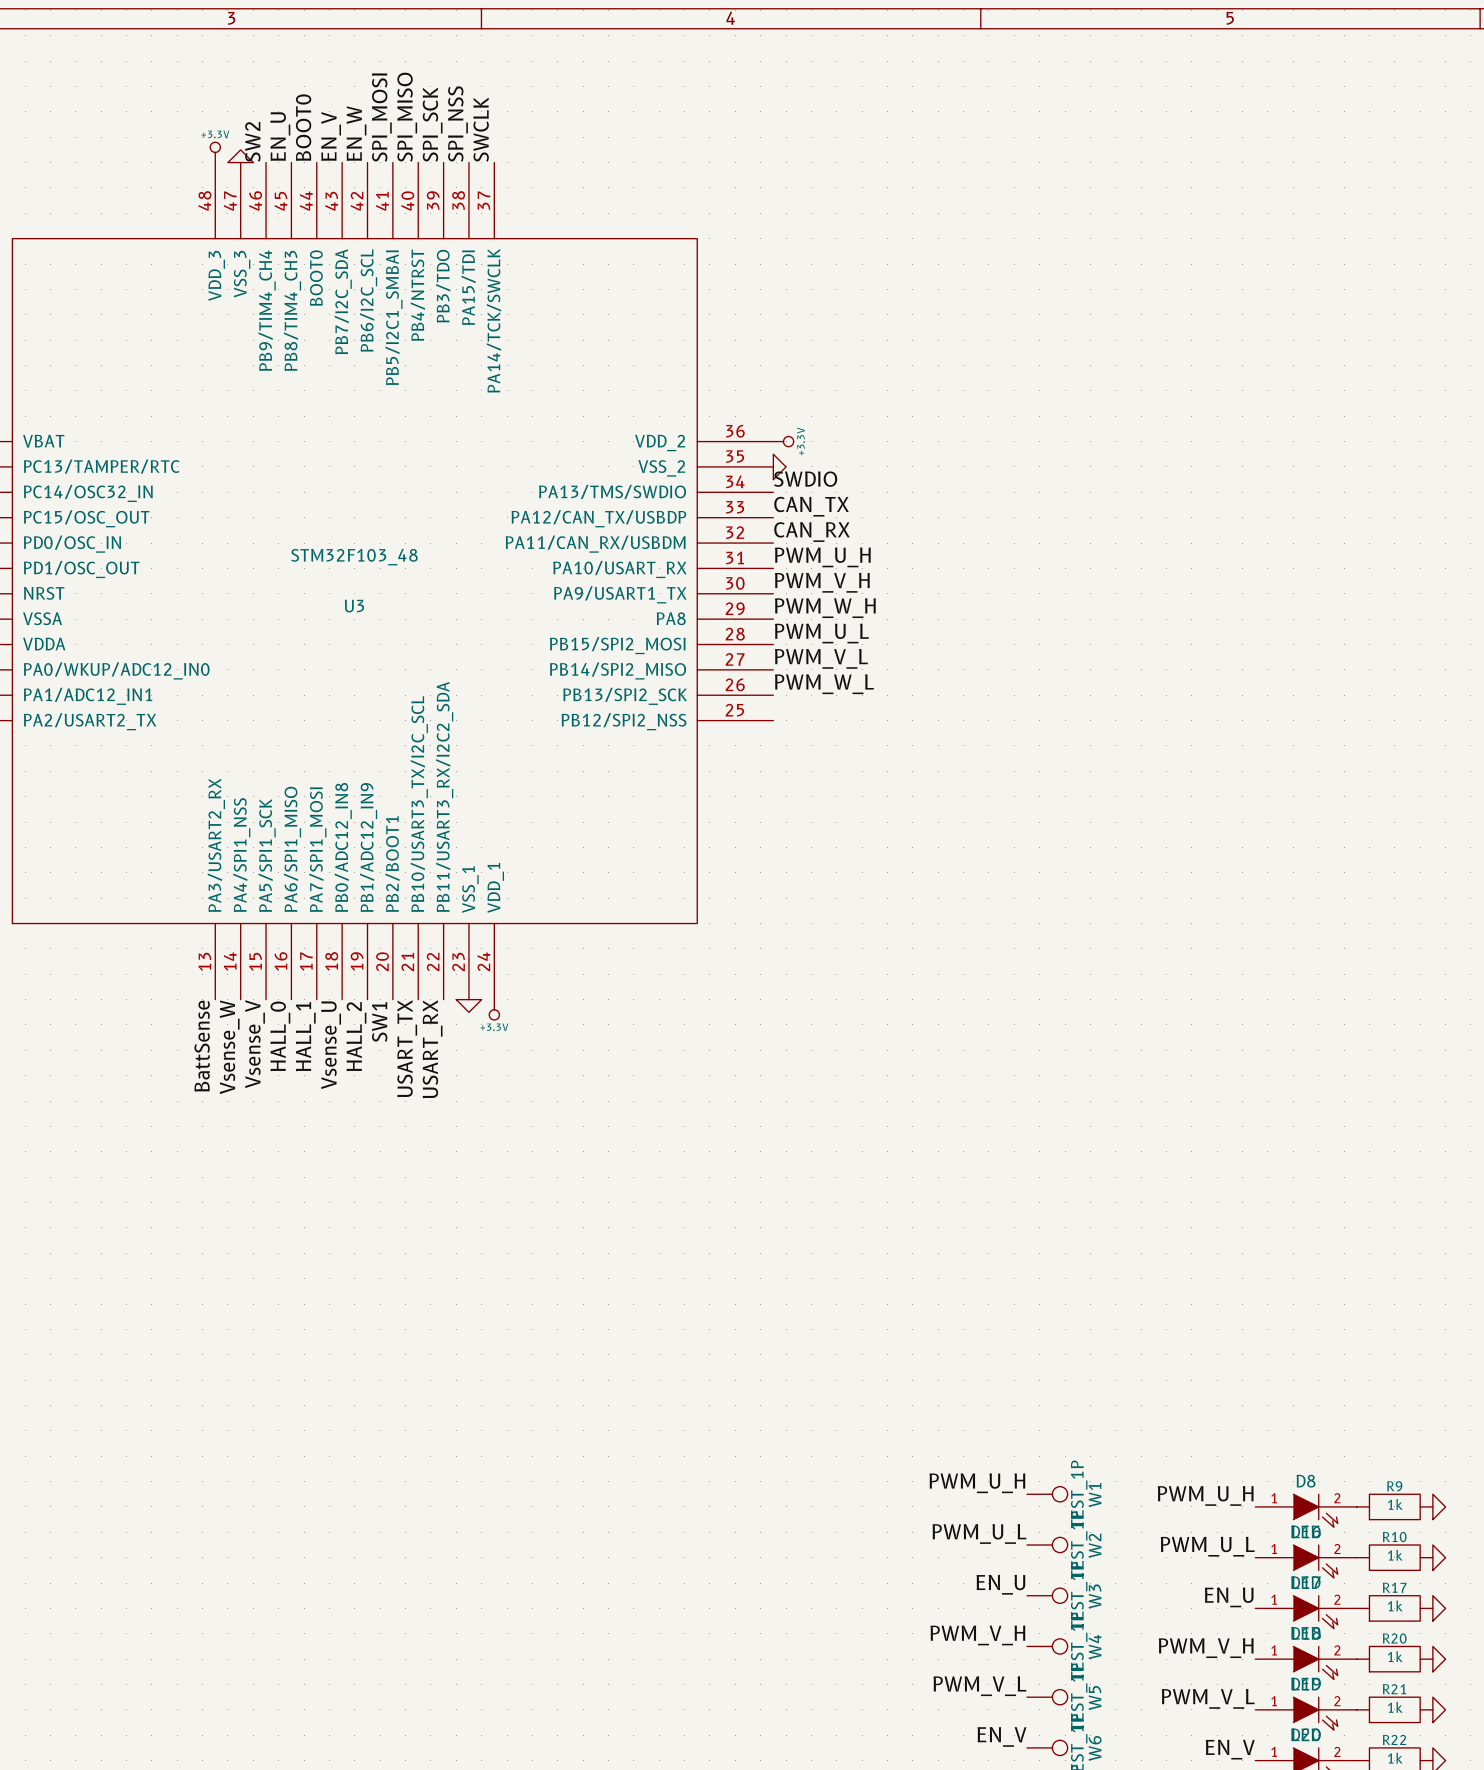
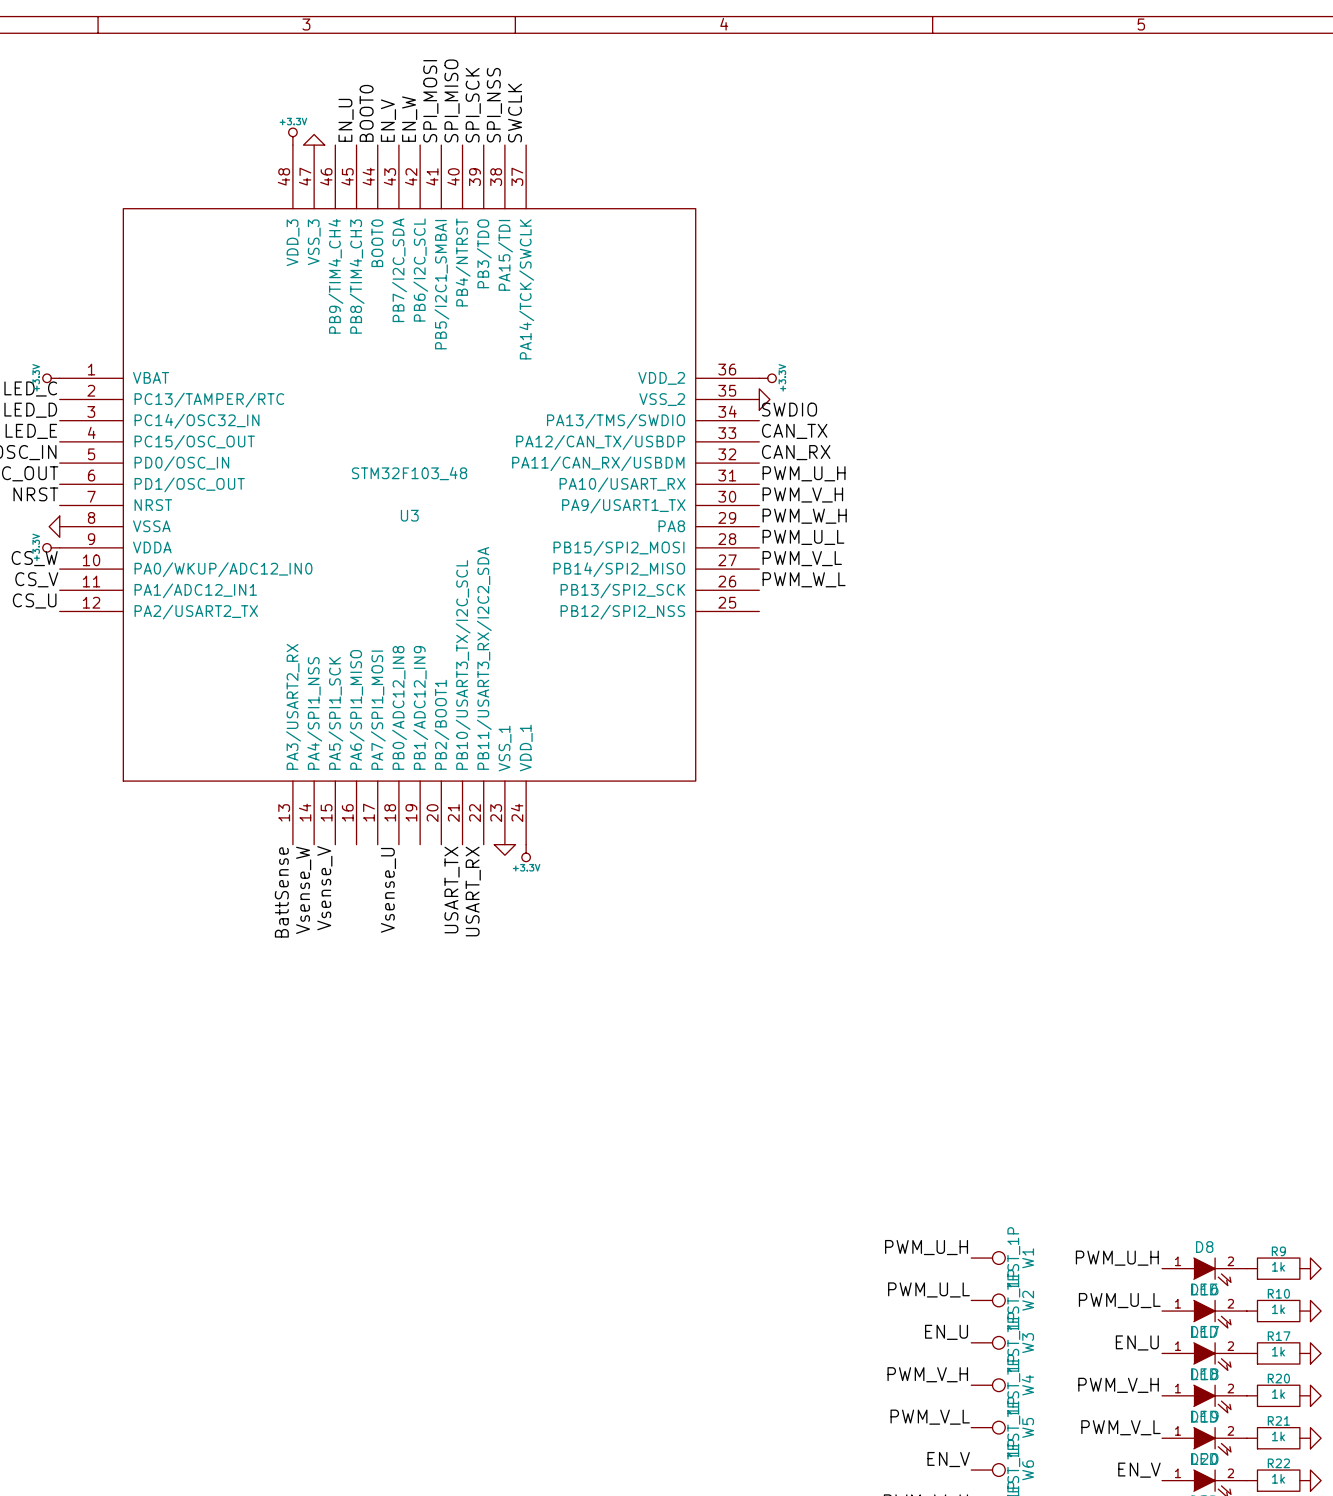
label: SW2 (252, 141) -> none
label: SW1 (379, 1022) -> none
label: HALL_0 (280, 1036) -> none
label: HALL_1 (305, 1036) -> none
label: HALL_2 (356, 1036) -> none

